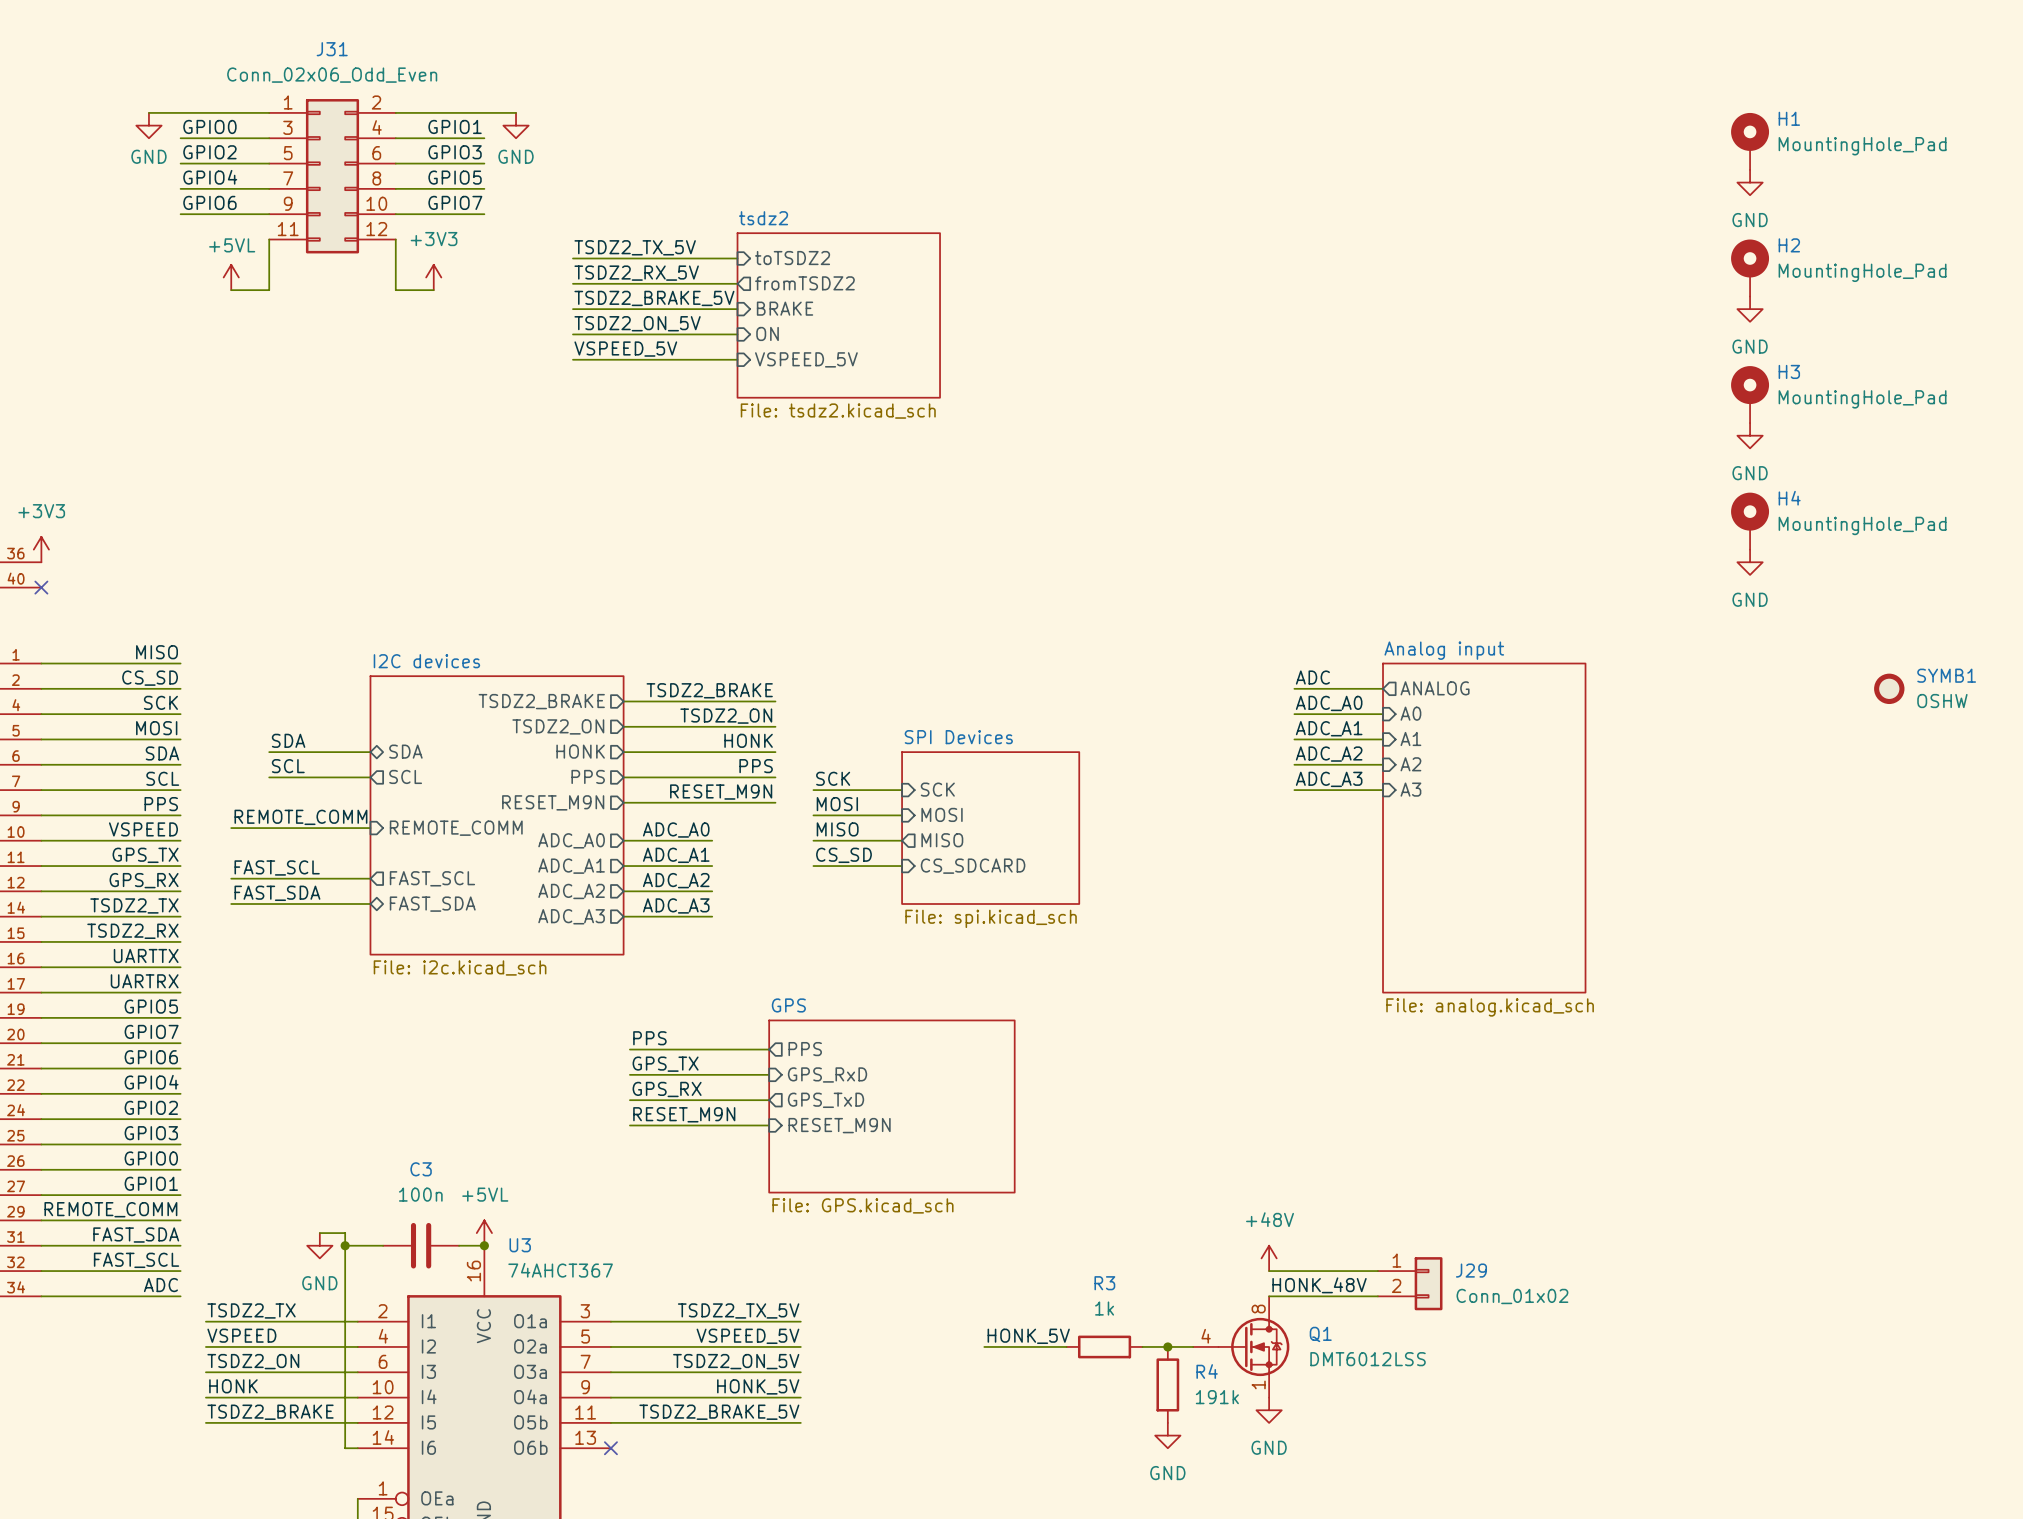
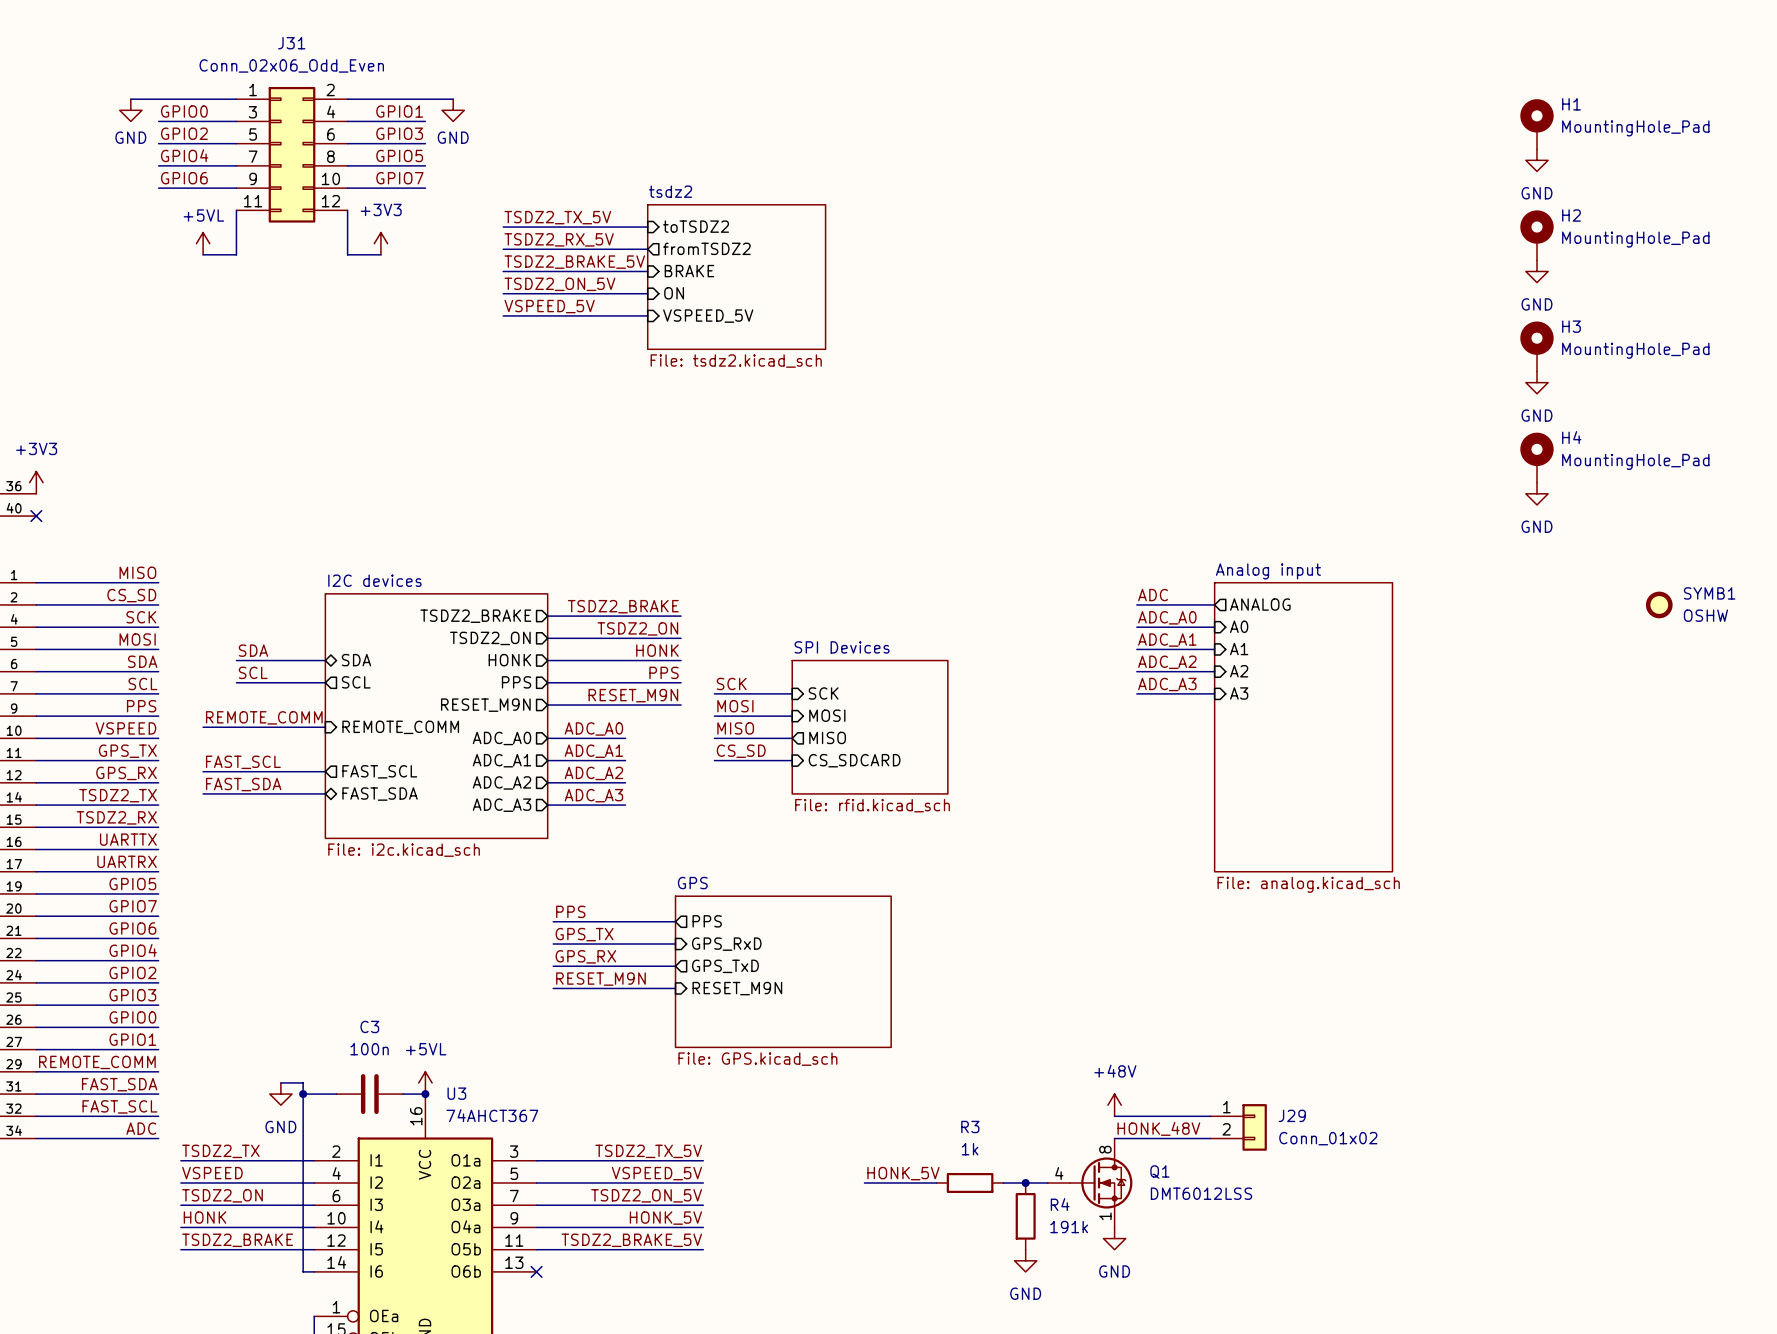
sheet SPI Devices value: File: spi.kicad_sch (991, 918) -> File: rfid.kicad_sch (872, 805)

